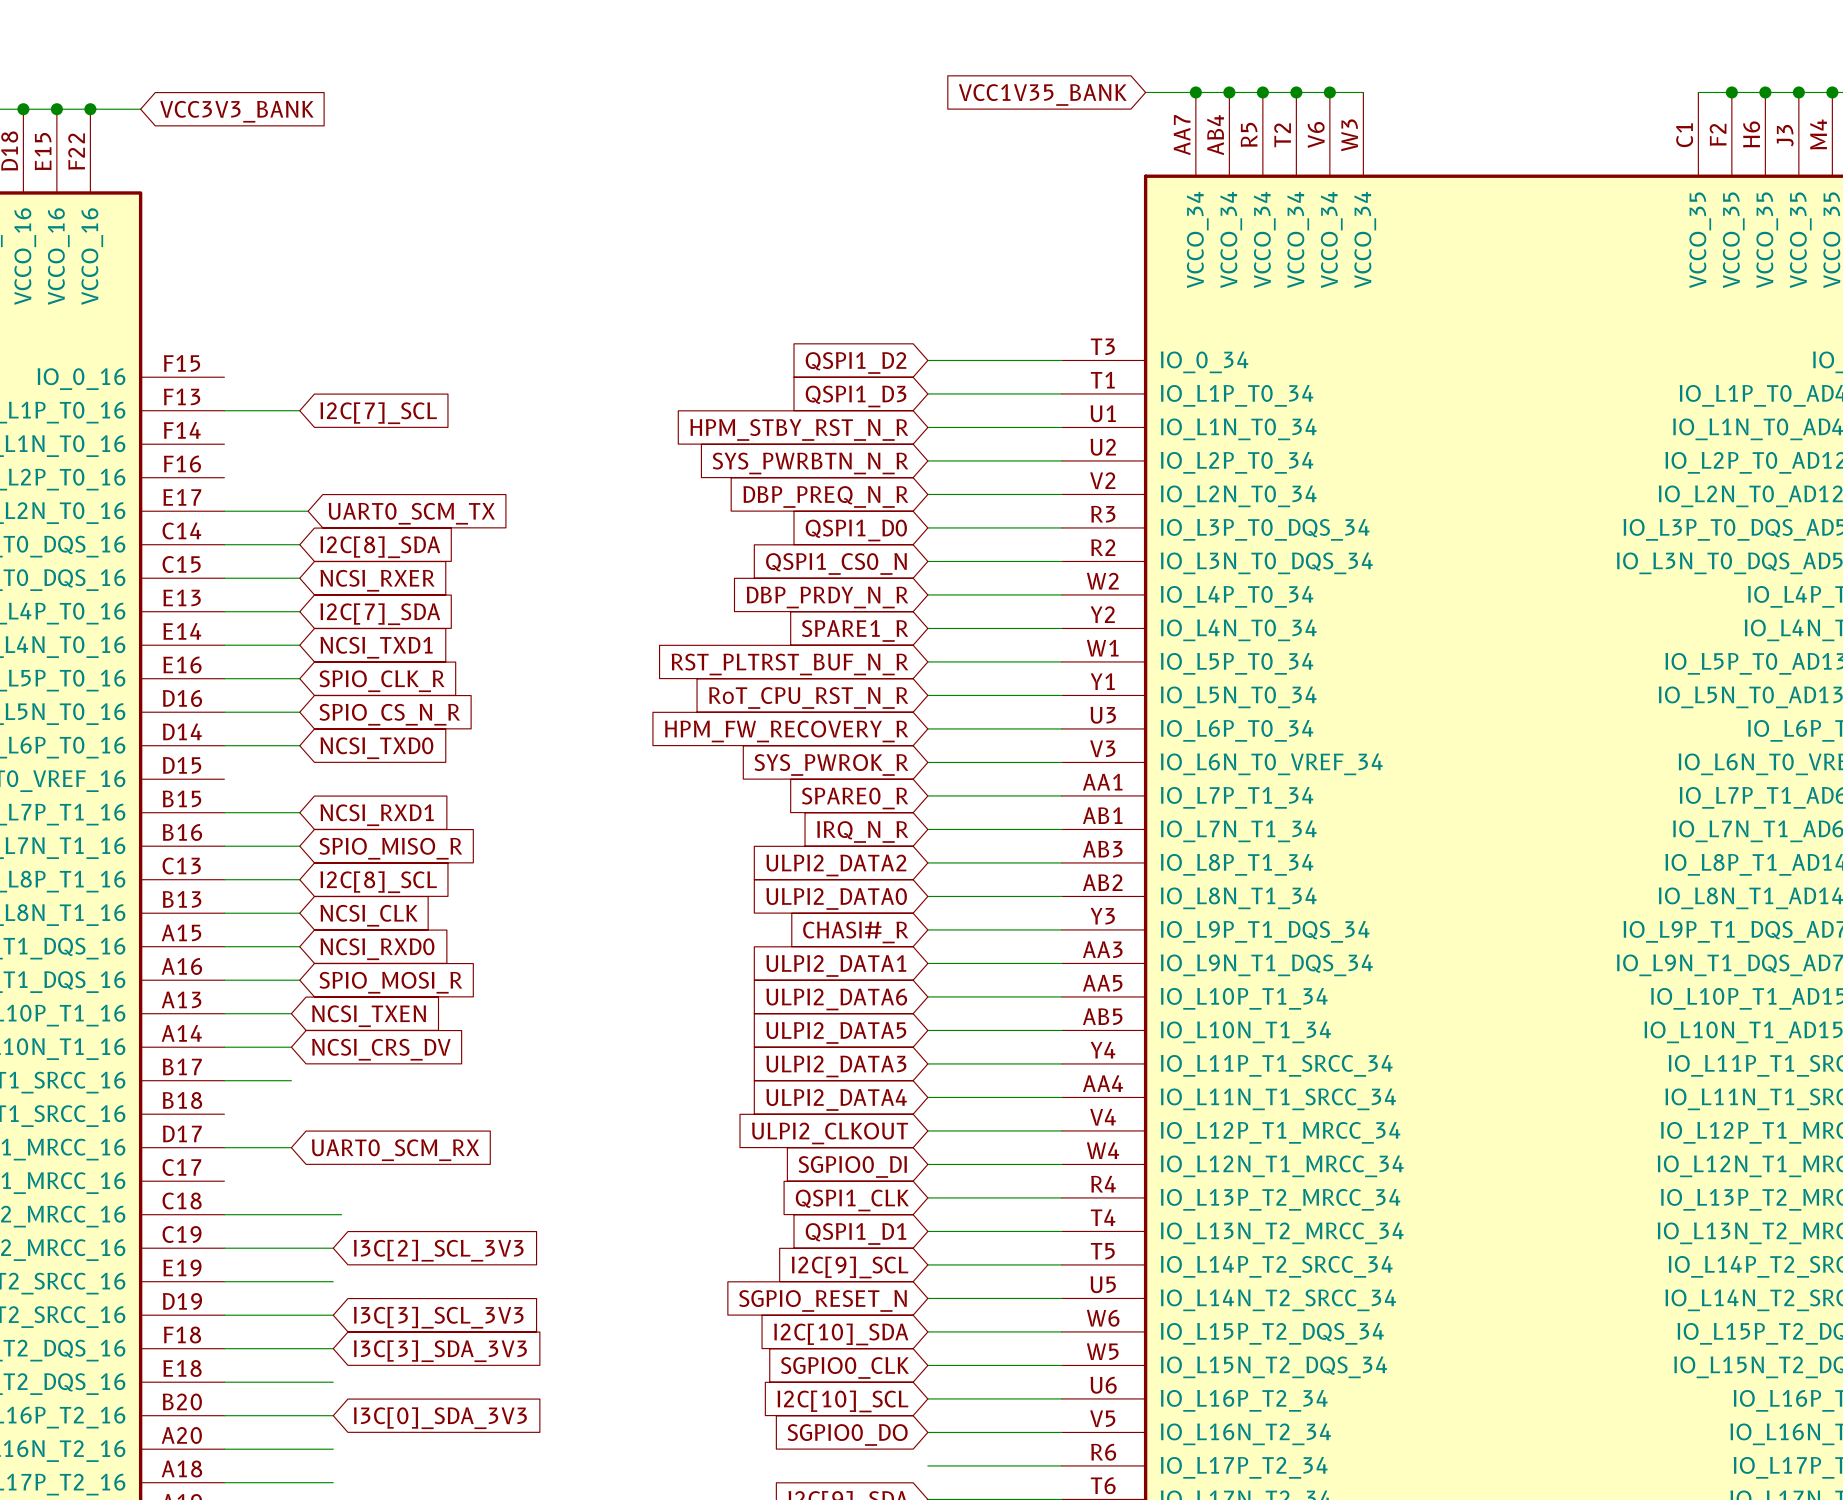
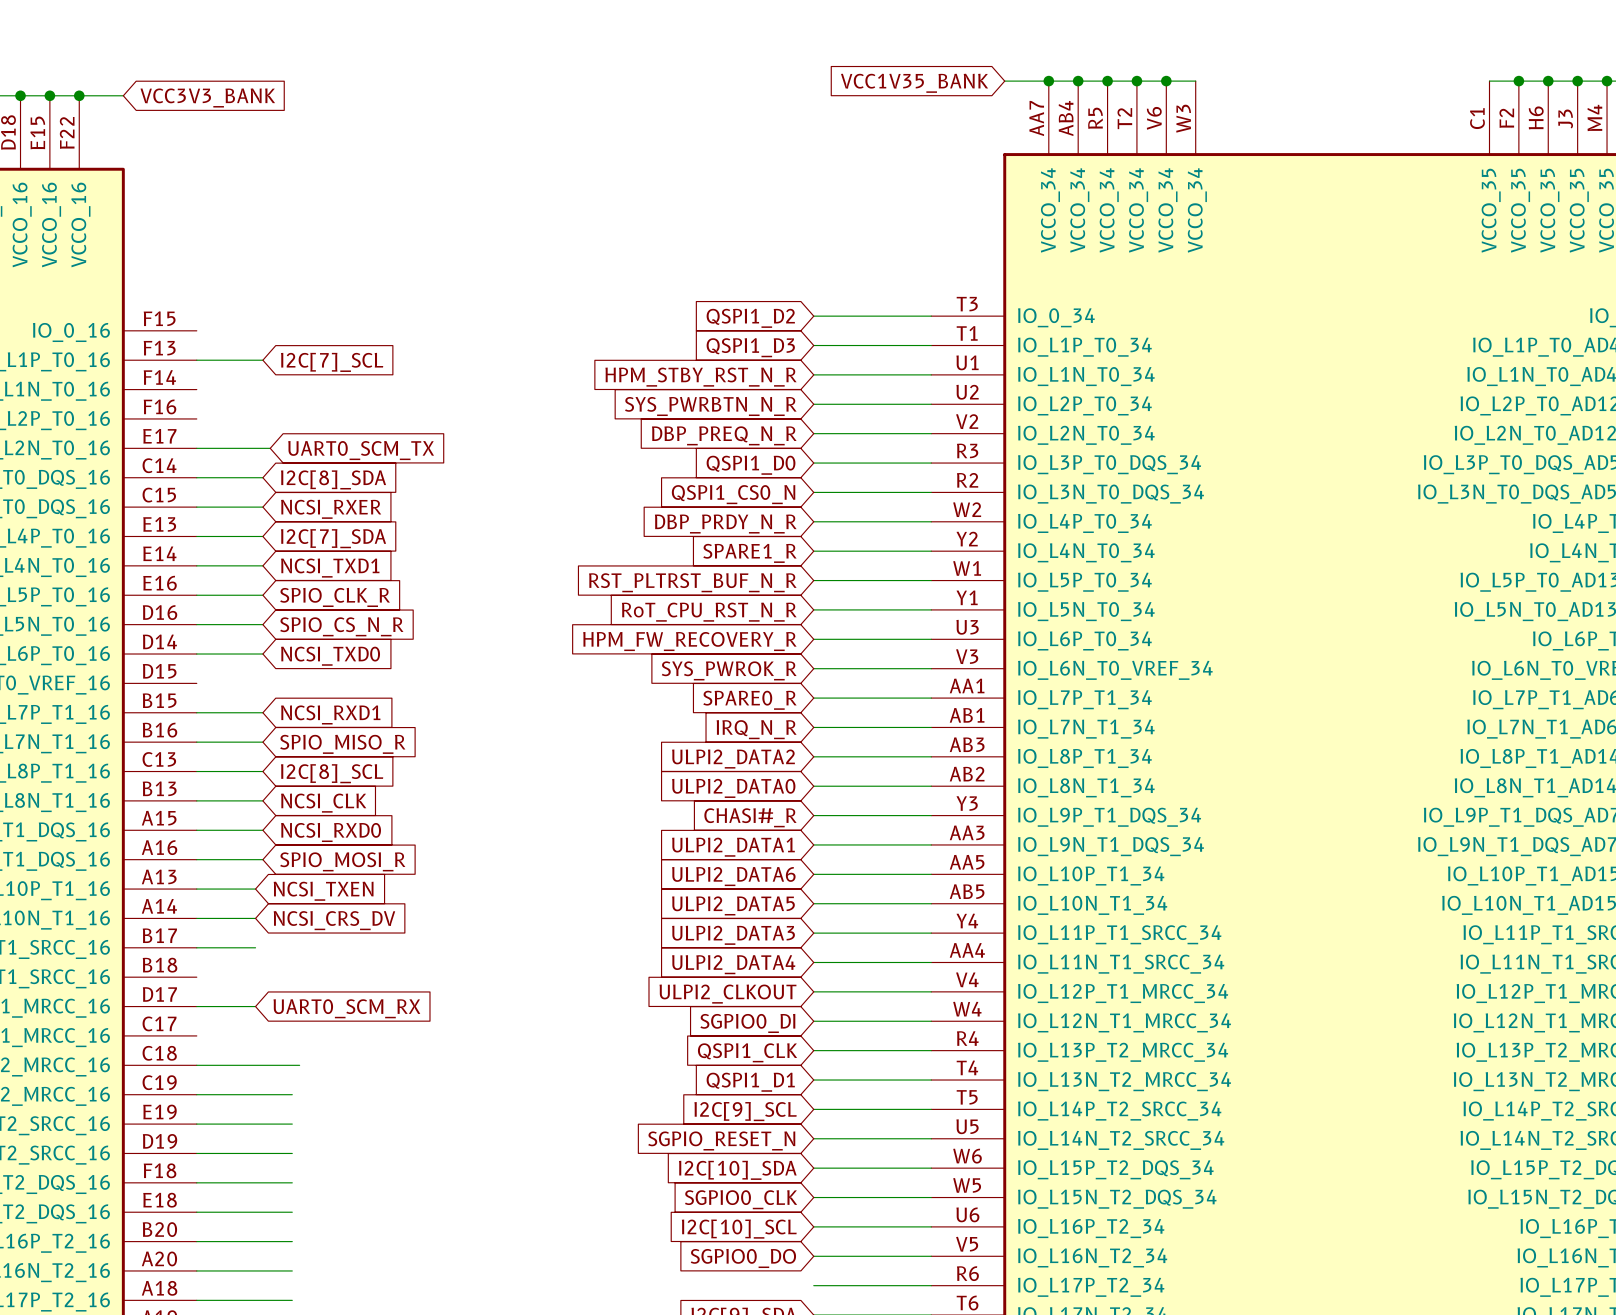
global label: I3C[2]_SCL_3V3 (438, 1250) -> none
global label: I3C[3]_SCL_3V3 (438, 1317) -> none
global label: I3C[3]_SDA_3V3 (440, 1351) -> none
global label: I3C[0]_SDA_3V3 (440, 1418) -> none

